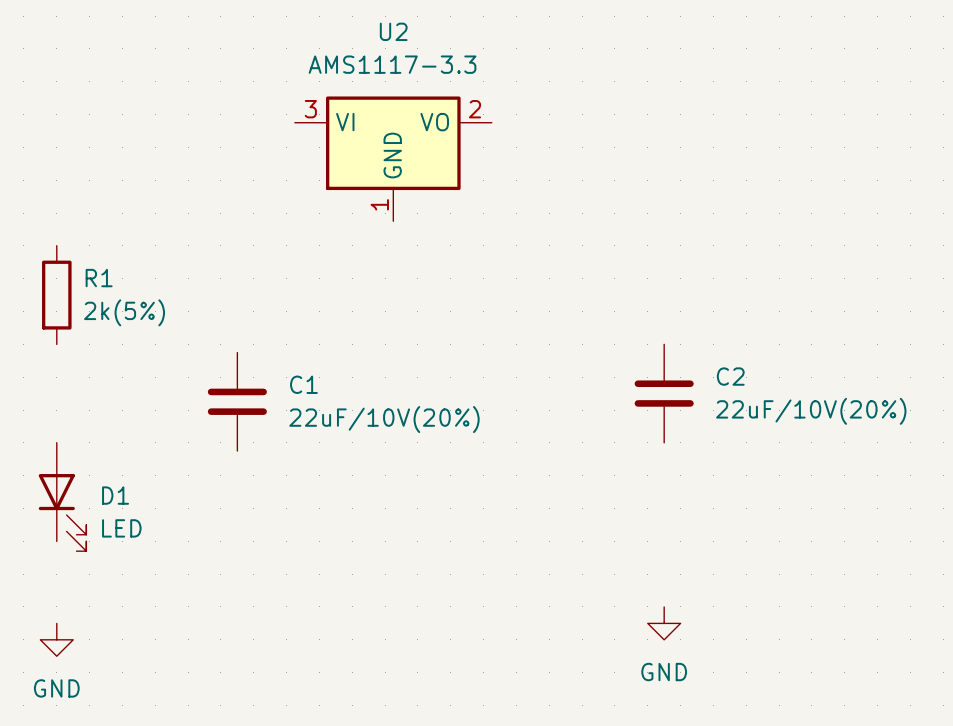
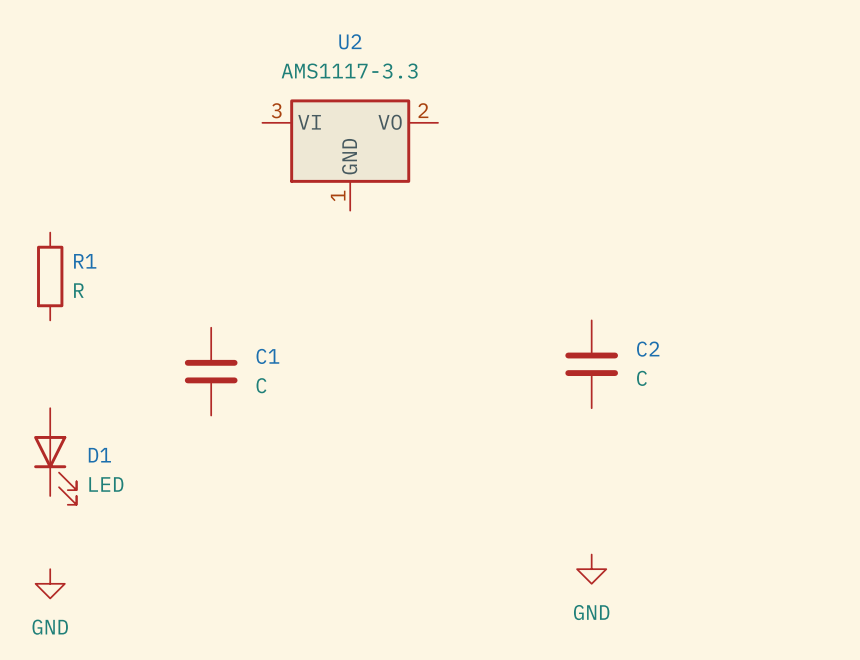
R1 value: 2k(5%) (124, 312) -> R (78, 290)
C2 value: 22uF/10V(20%) (811, 411) -> C (641, 378)
C1 value: 22uF/10V(20%) (384, 419) -> C (261, 385)

